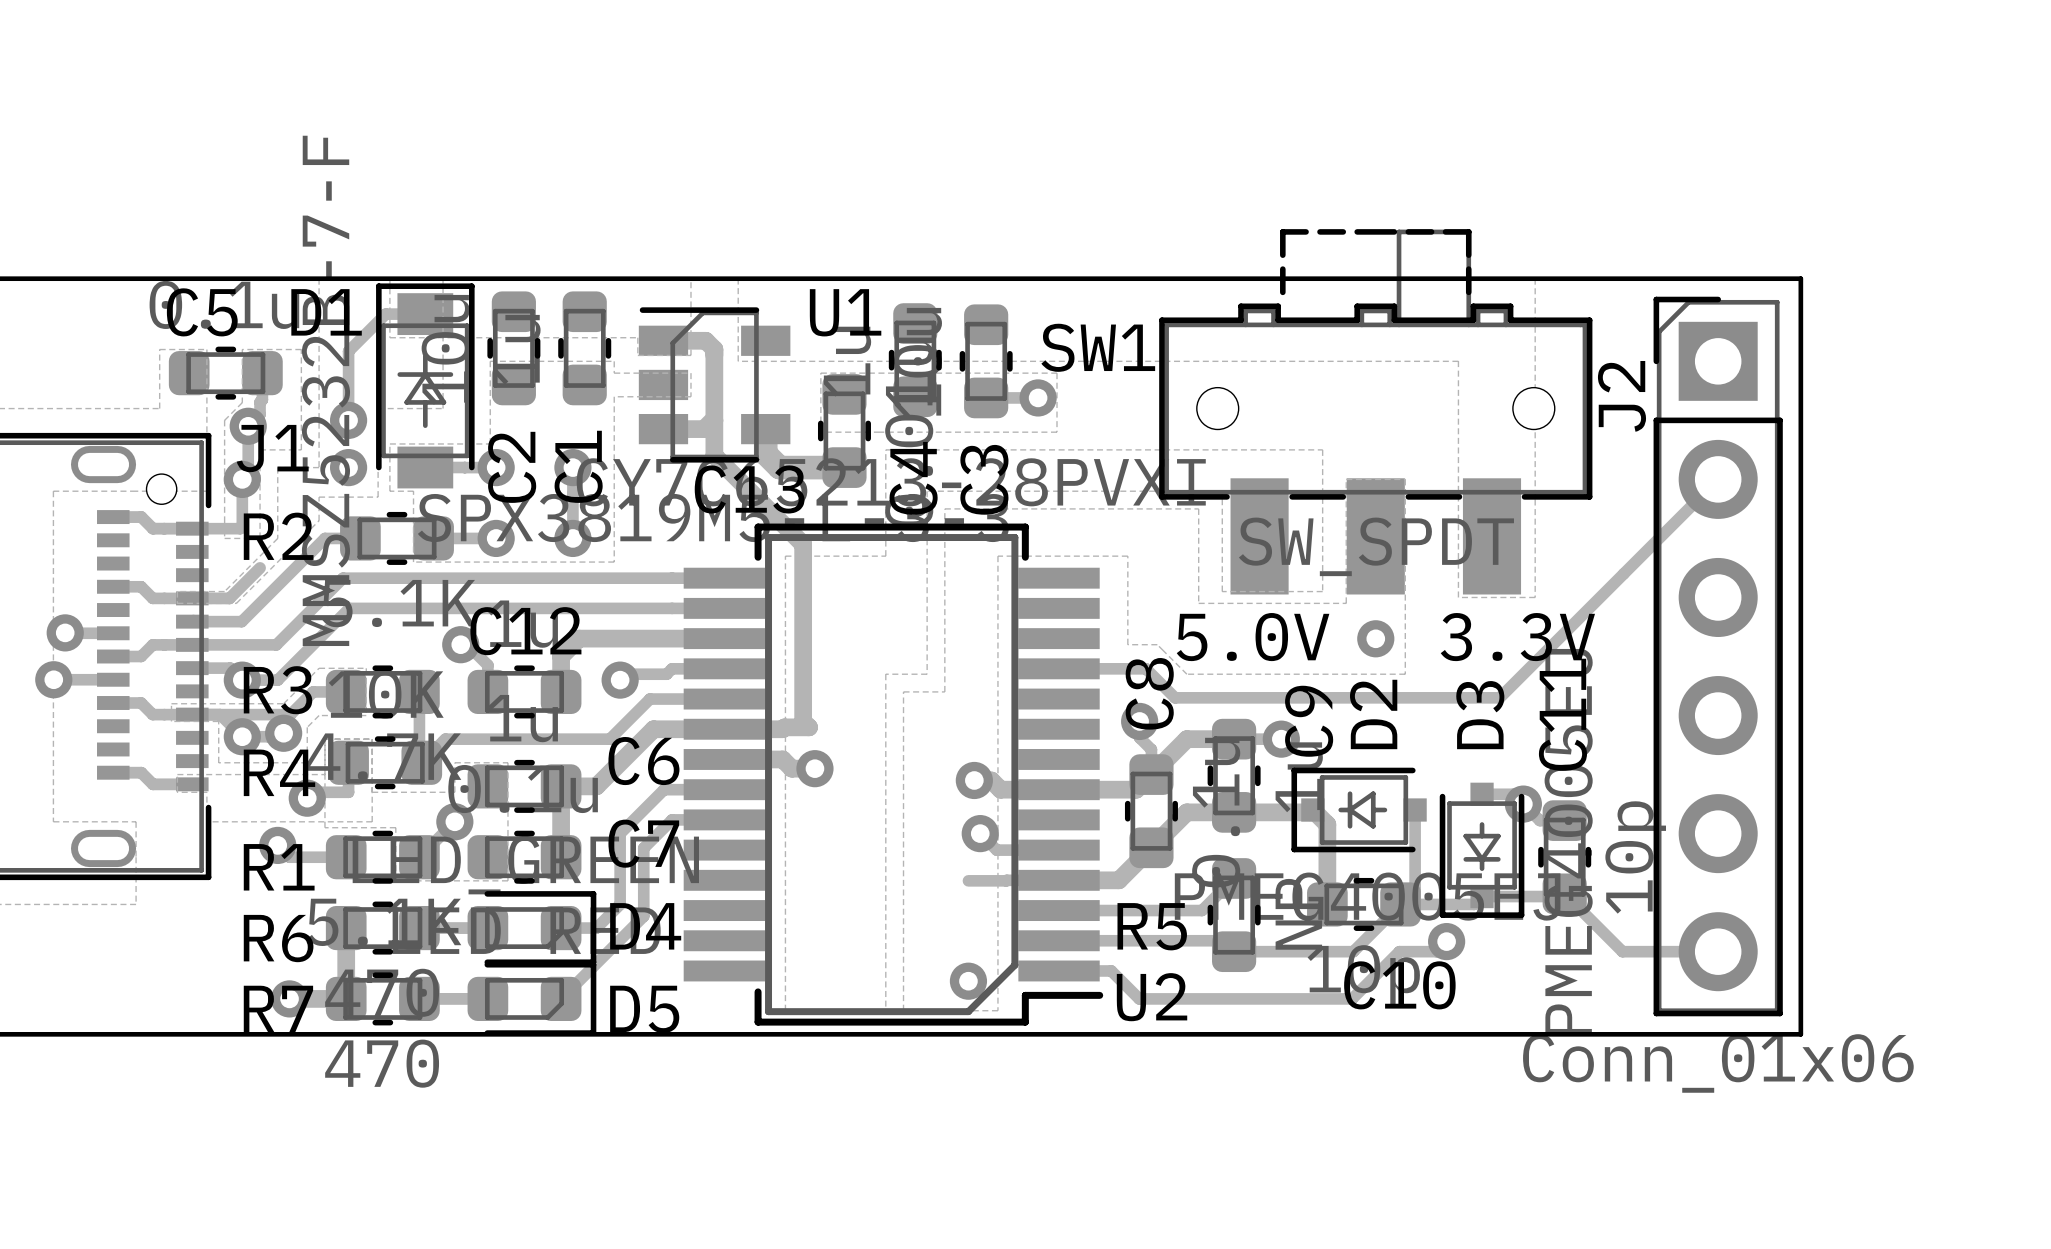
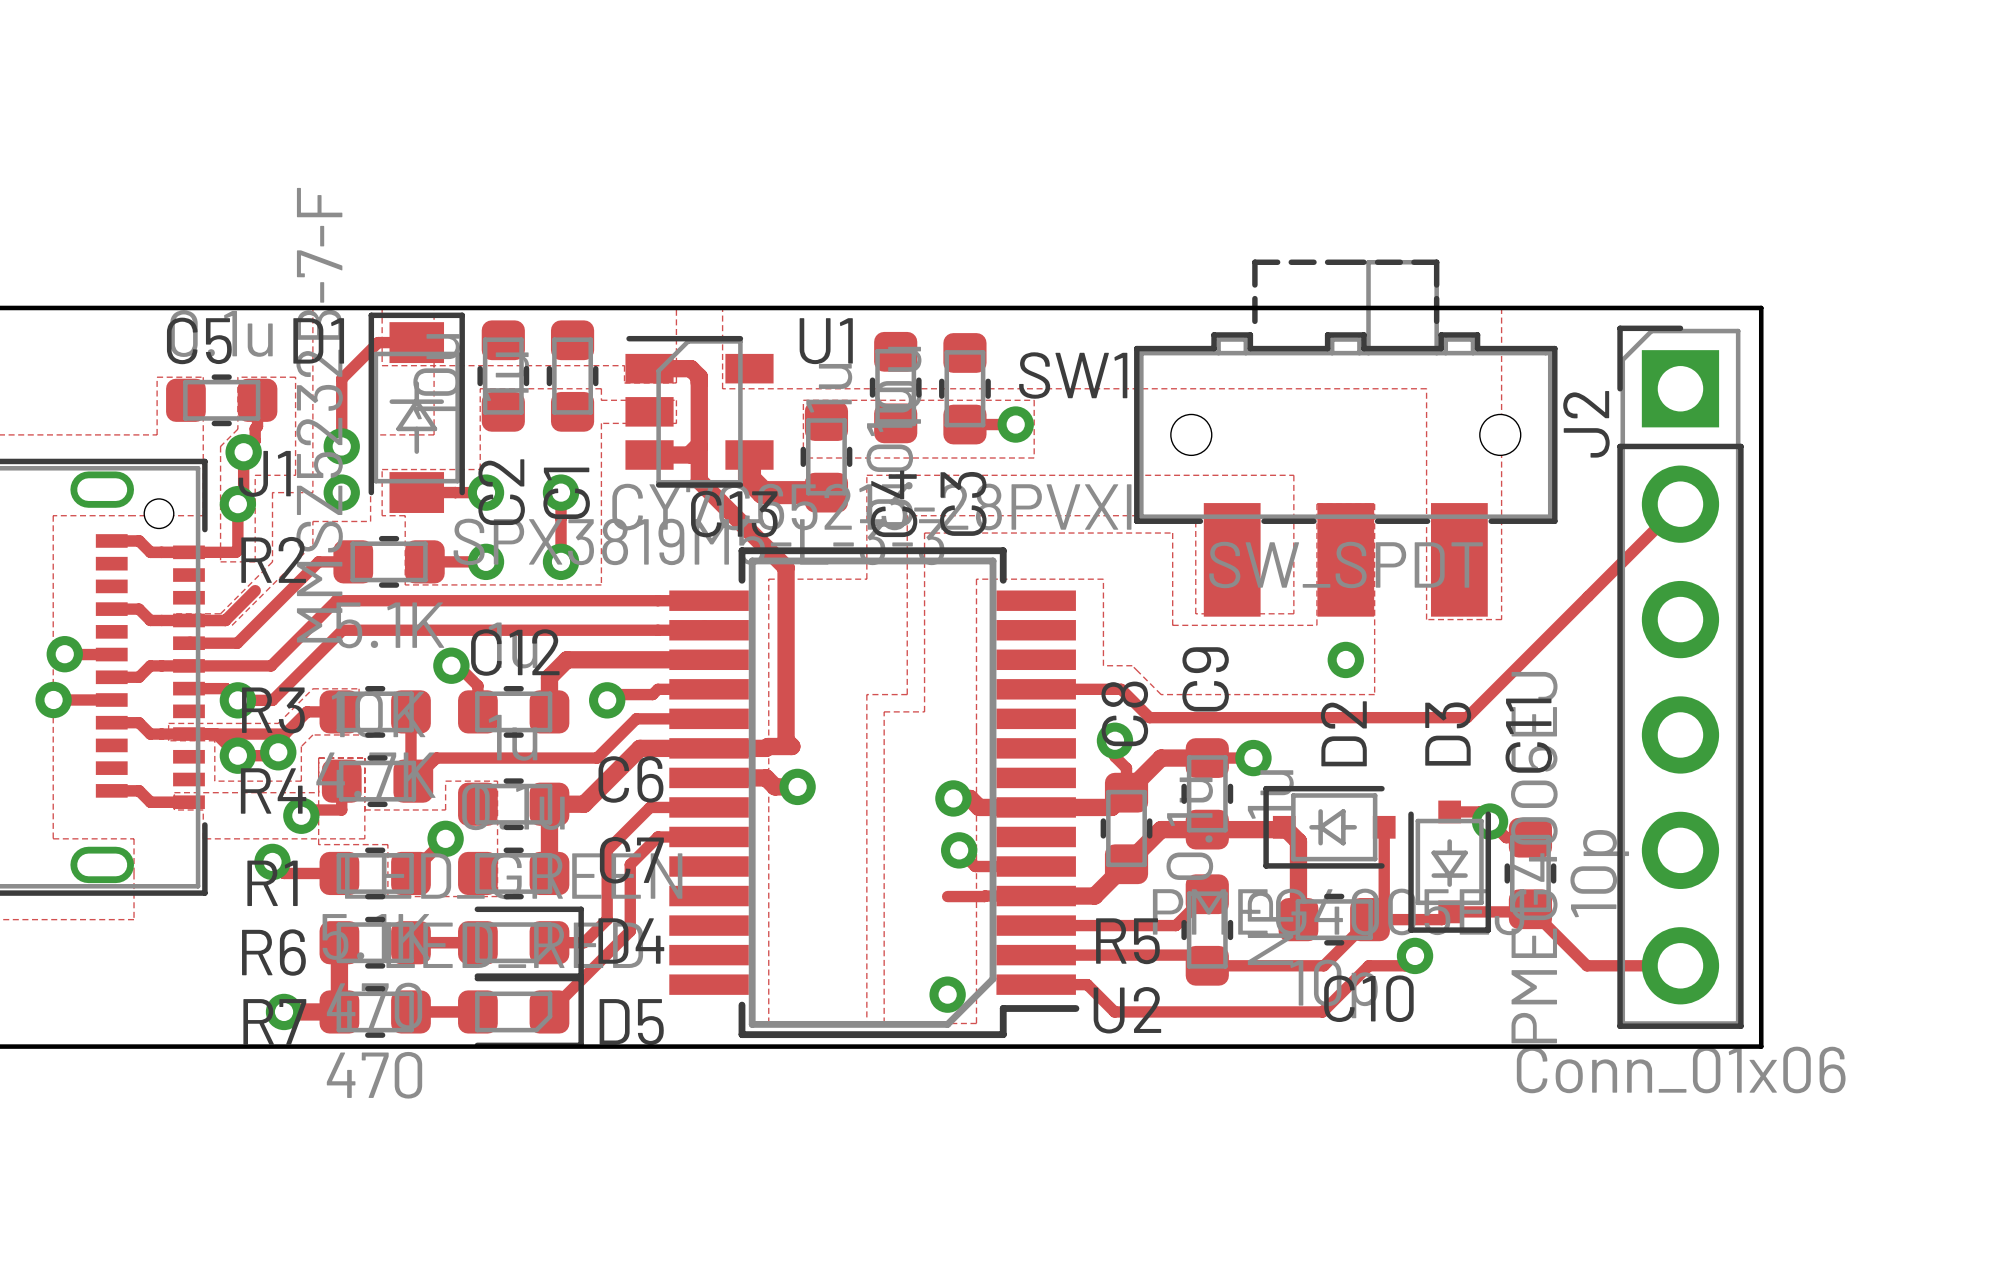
text: 5.0V (1253, 637) -> none
text: 3.3V (1517, 637) -> none
C9 name position: C9 (1309, 721) -> C9 (1205, 679)

